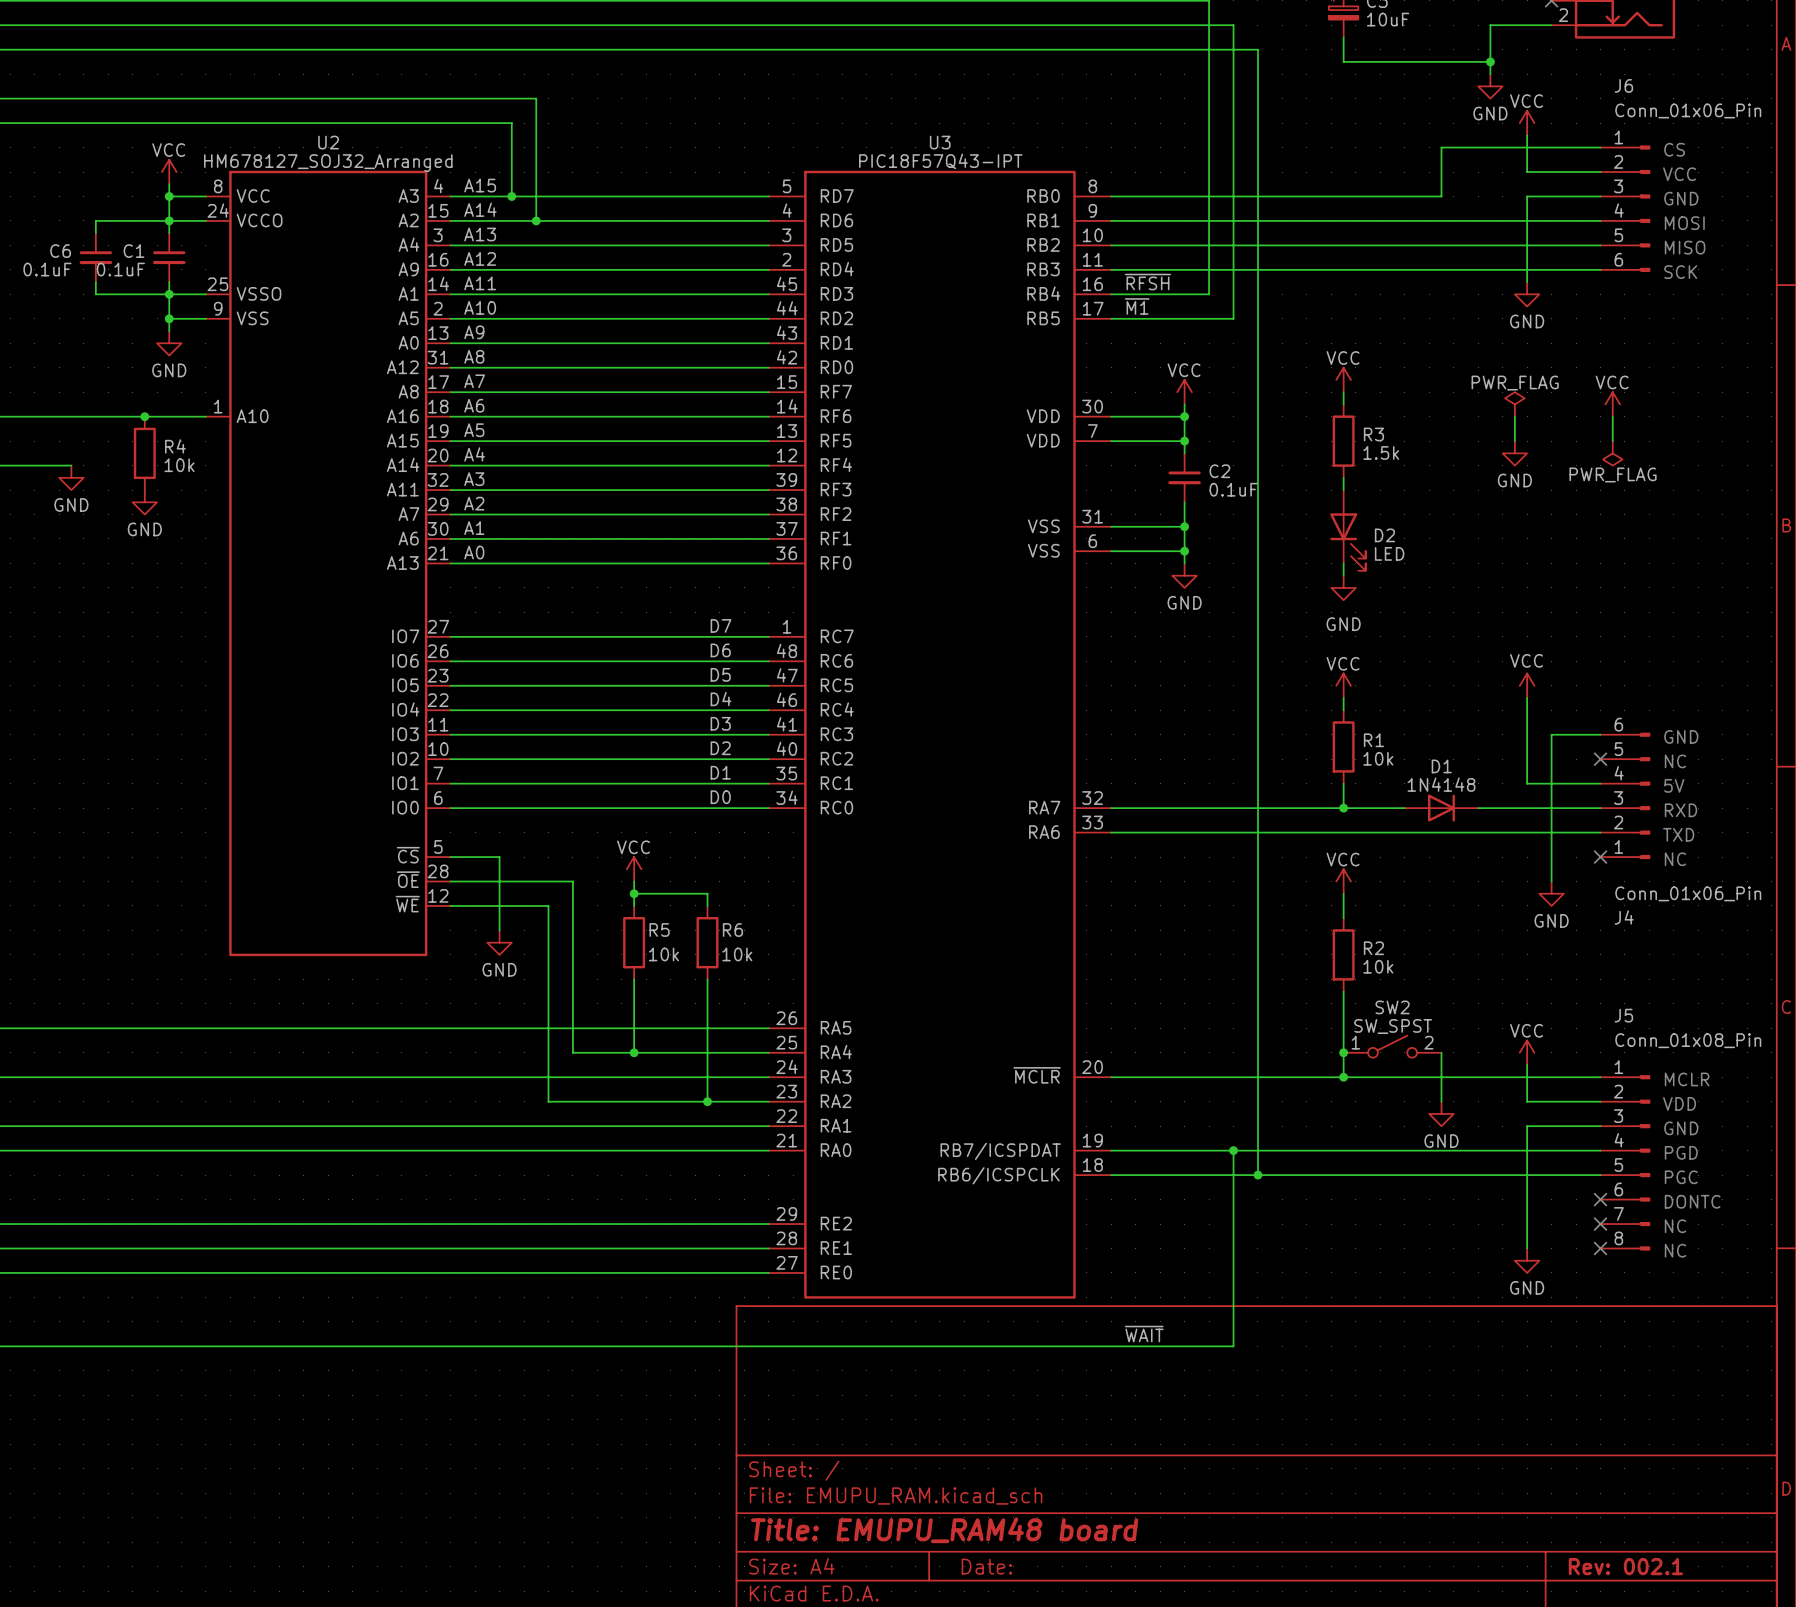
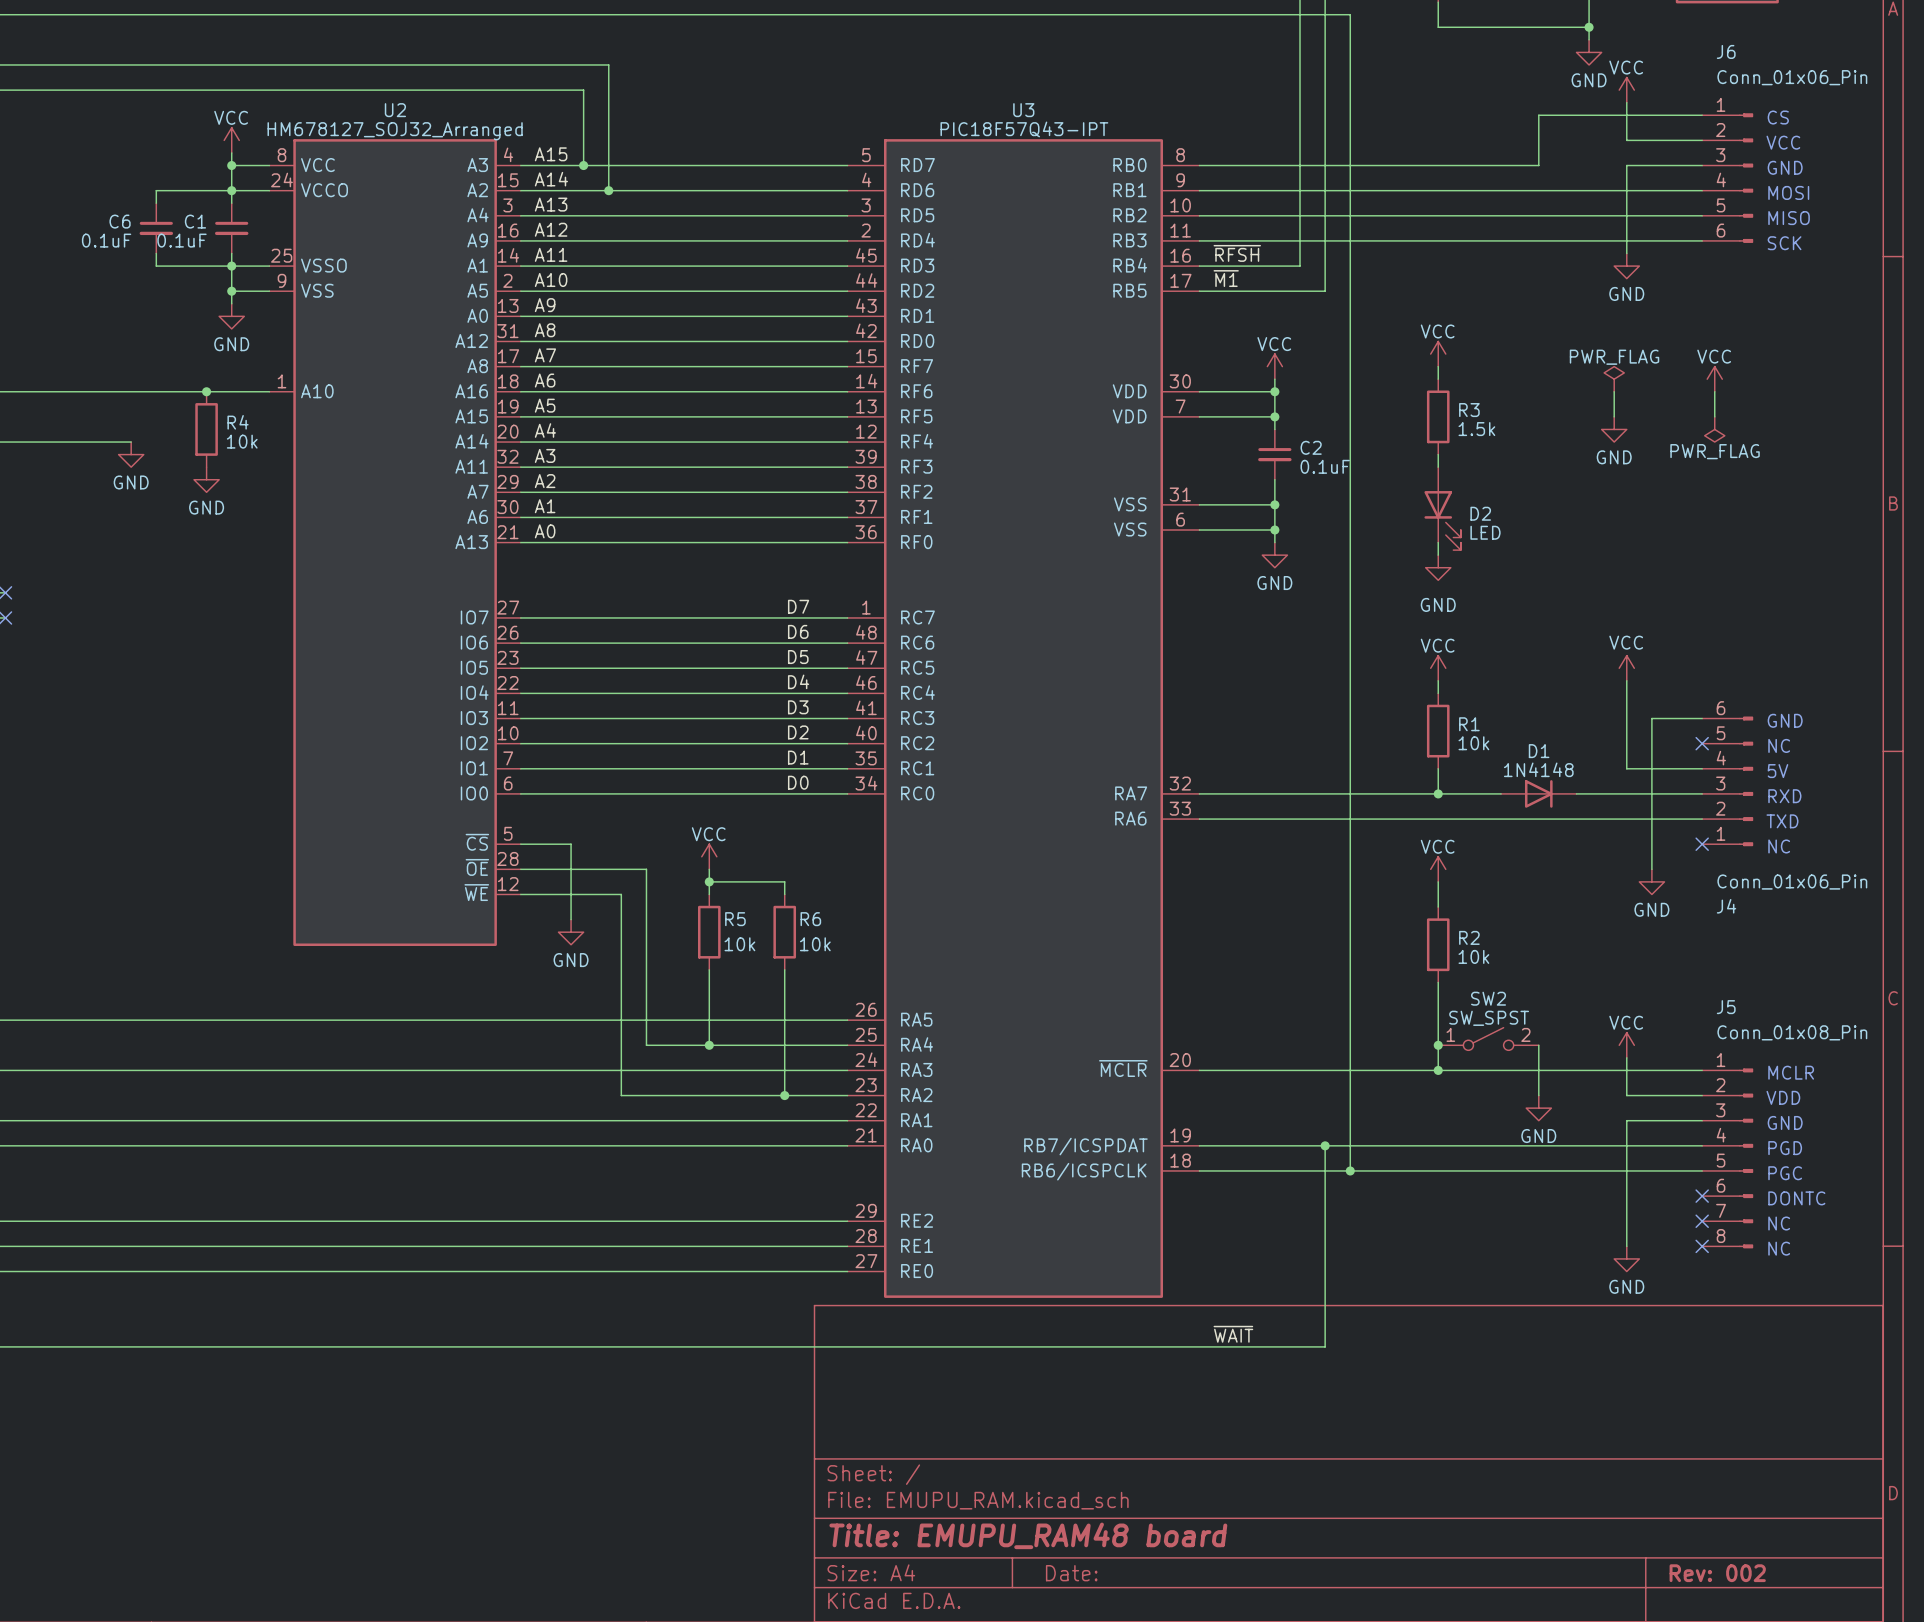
title block: Rev: 002.1 (1625, 1566) -> Rev: 002 (1717, 1573)

